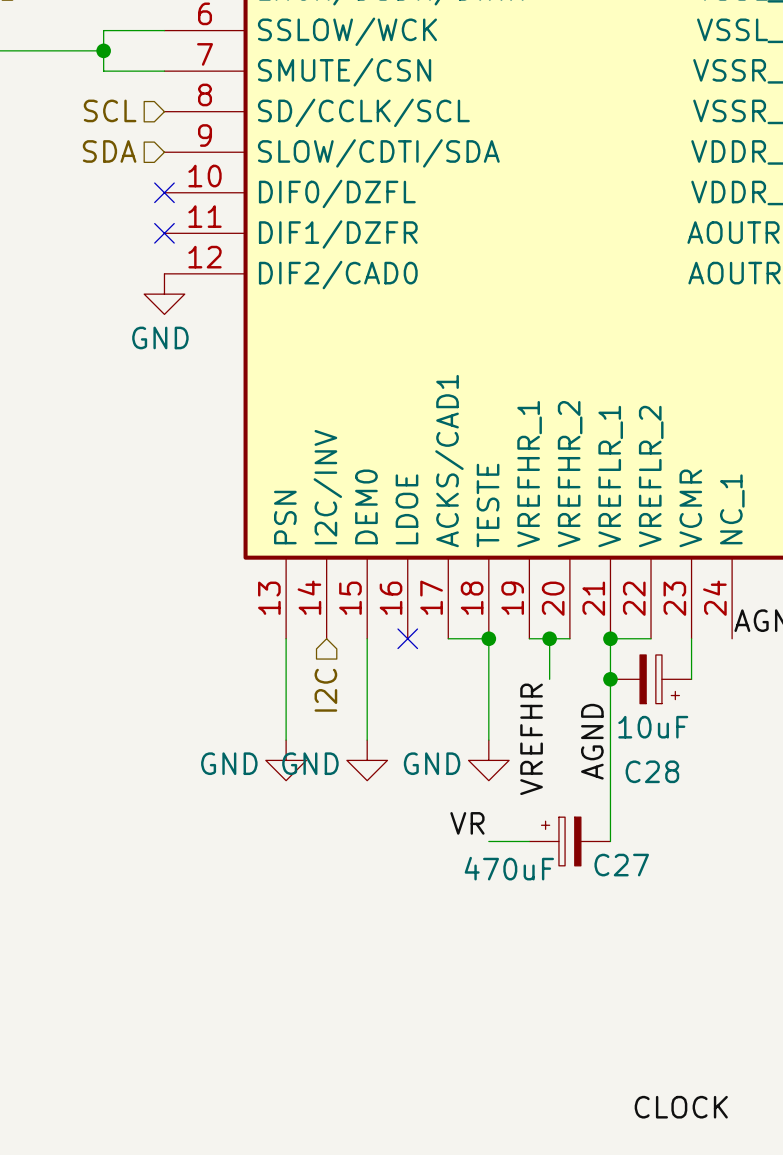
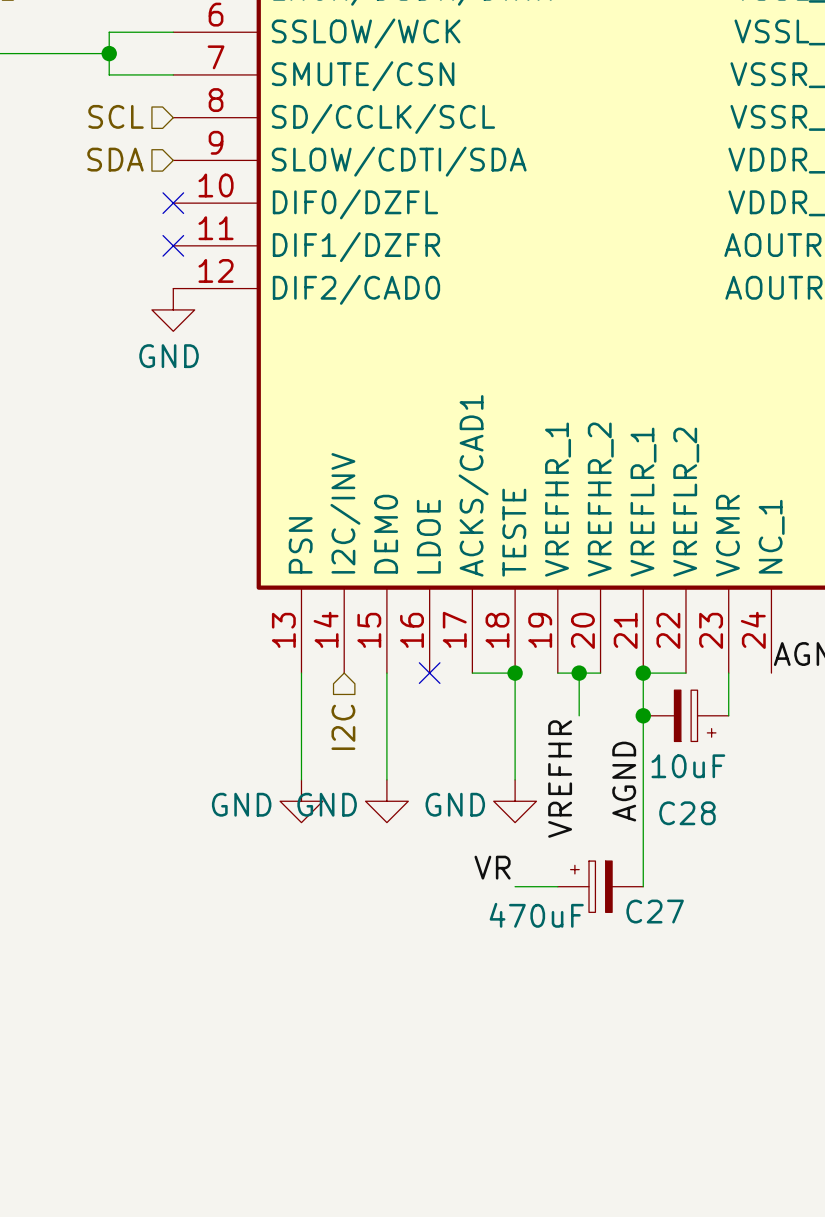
label: CLOCK (681, 1107) -> none

